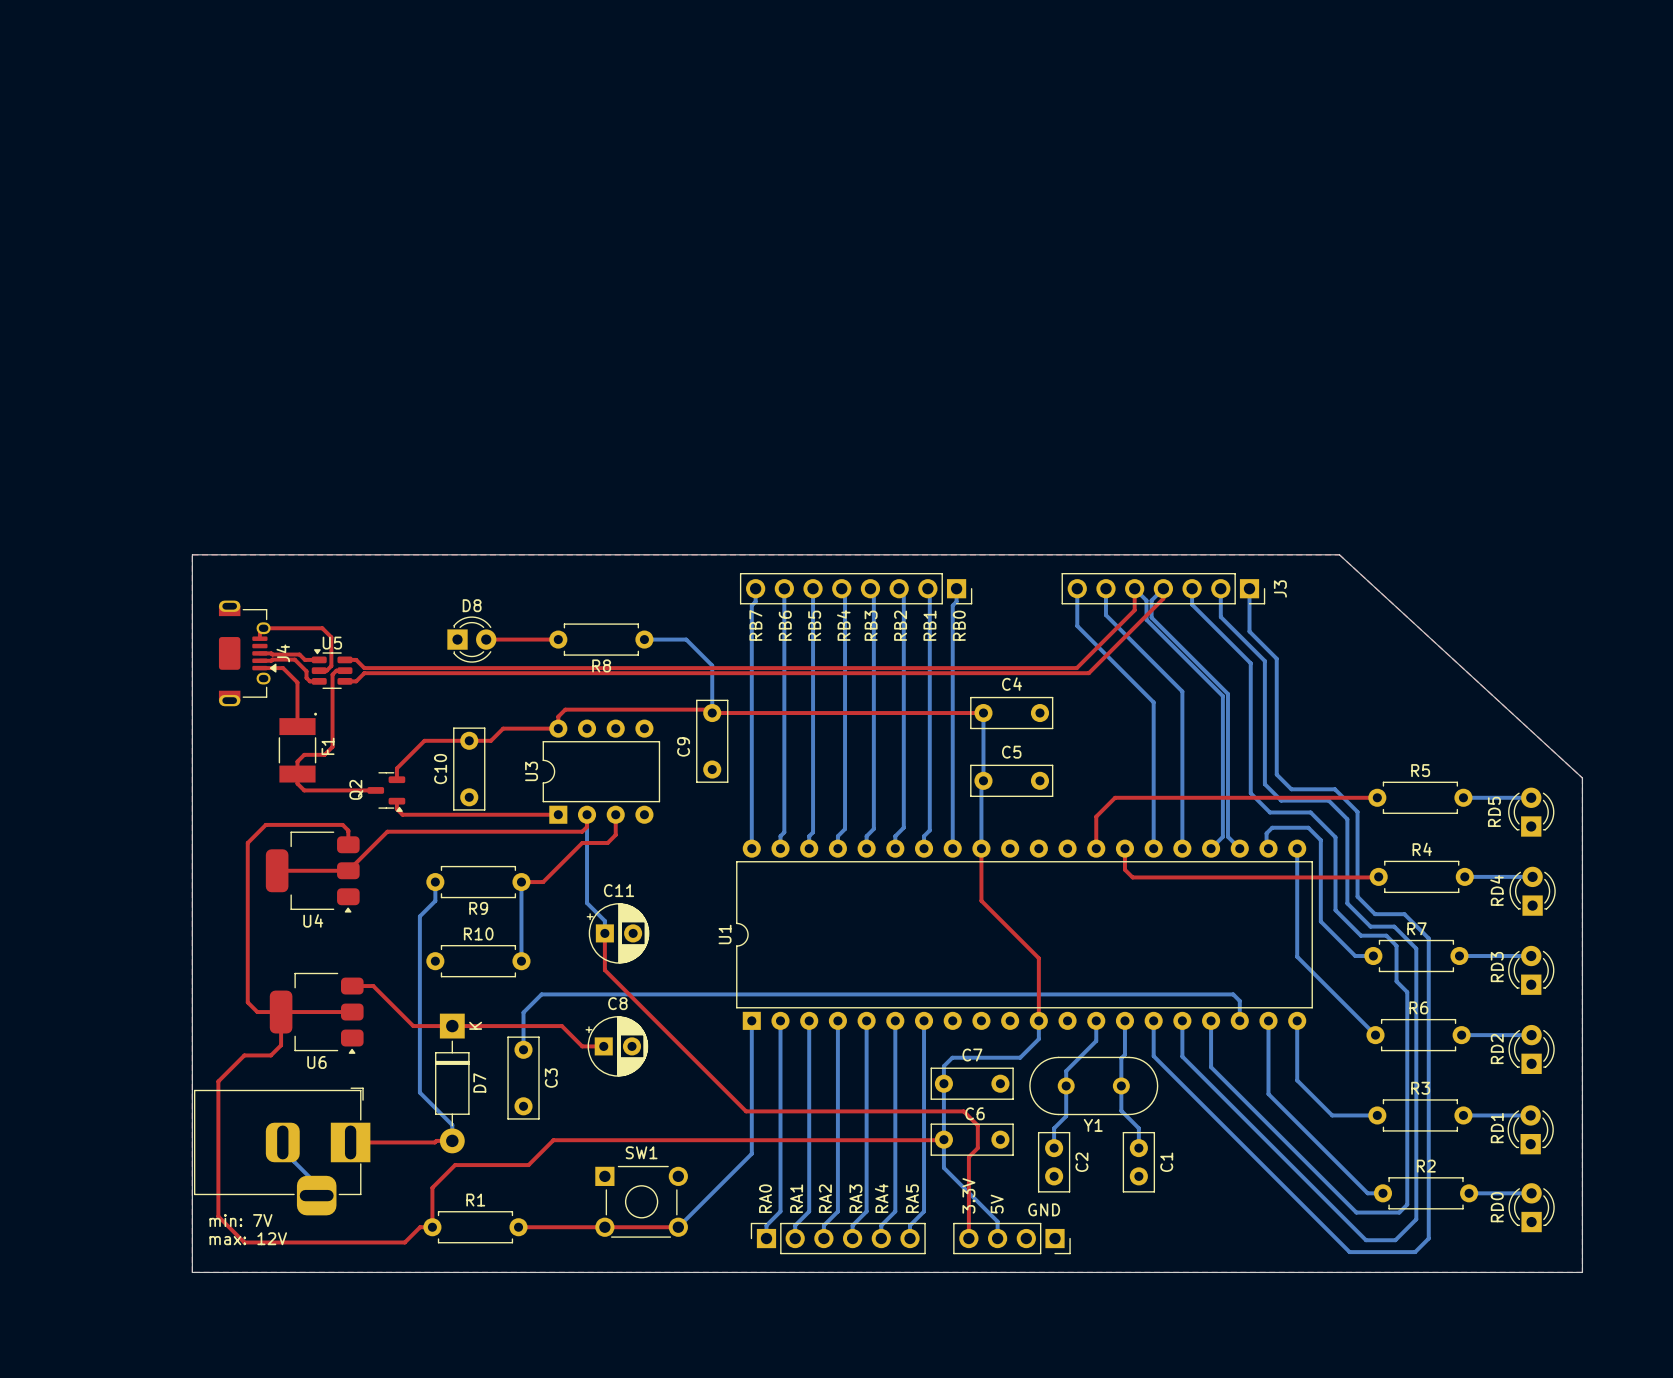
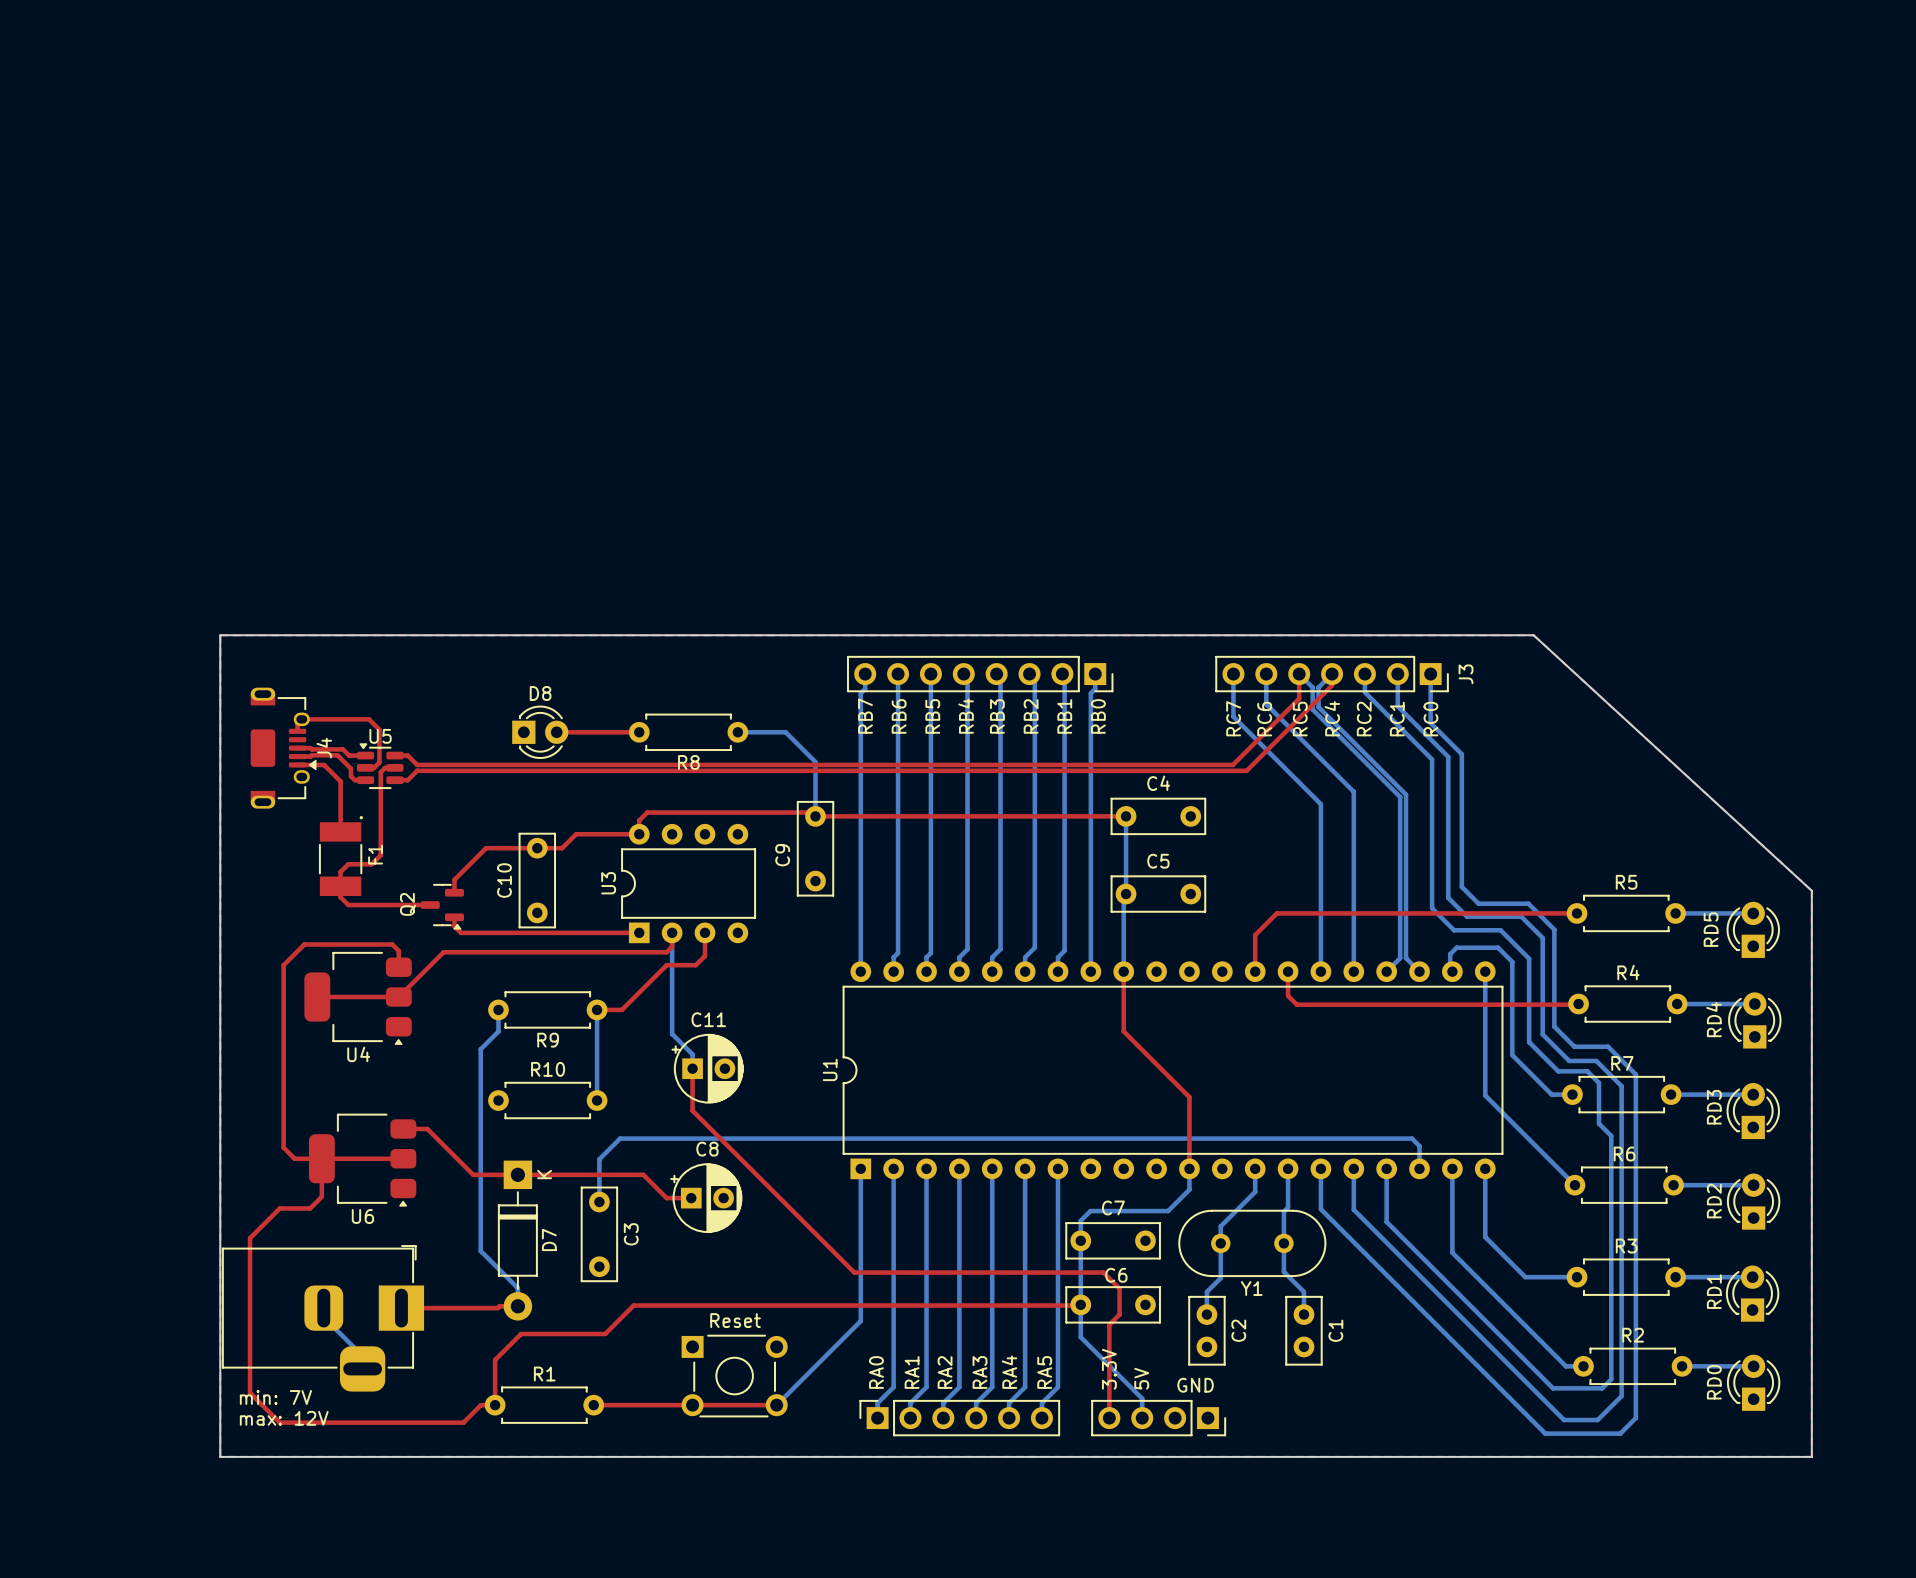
text: none -> RC7 (1233, 718)
text: none -> RC6 (1264, 719)
text: none -> RC5 (1300, 719)
text: none -> RC4 (1332, 718)
text: none -> RC2 (1364, 719)
text: none -> RC1 (1397, 719)
text: none -> RC0 (1430, 719)
SW1 name: SW1 (641, 1152) -> none
text: none -> Reset (735, 1320)

